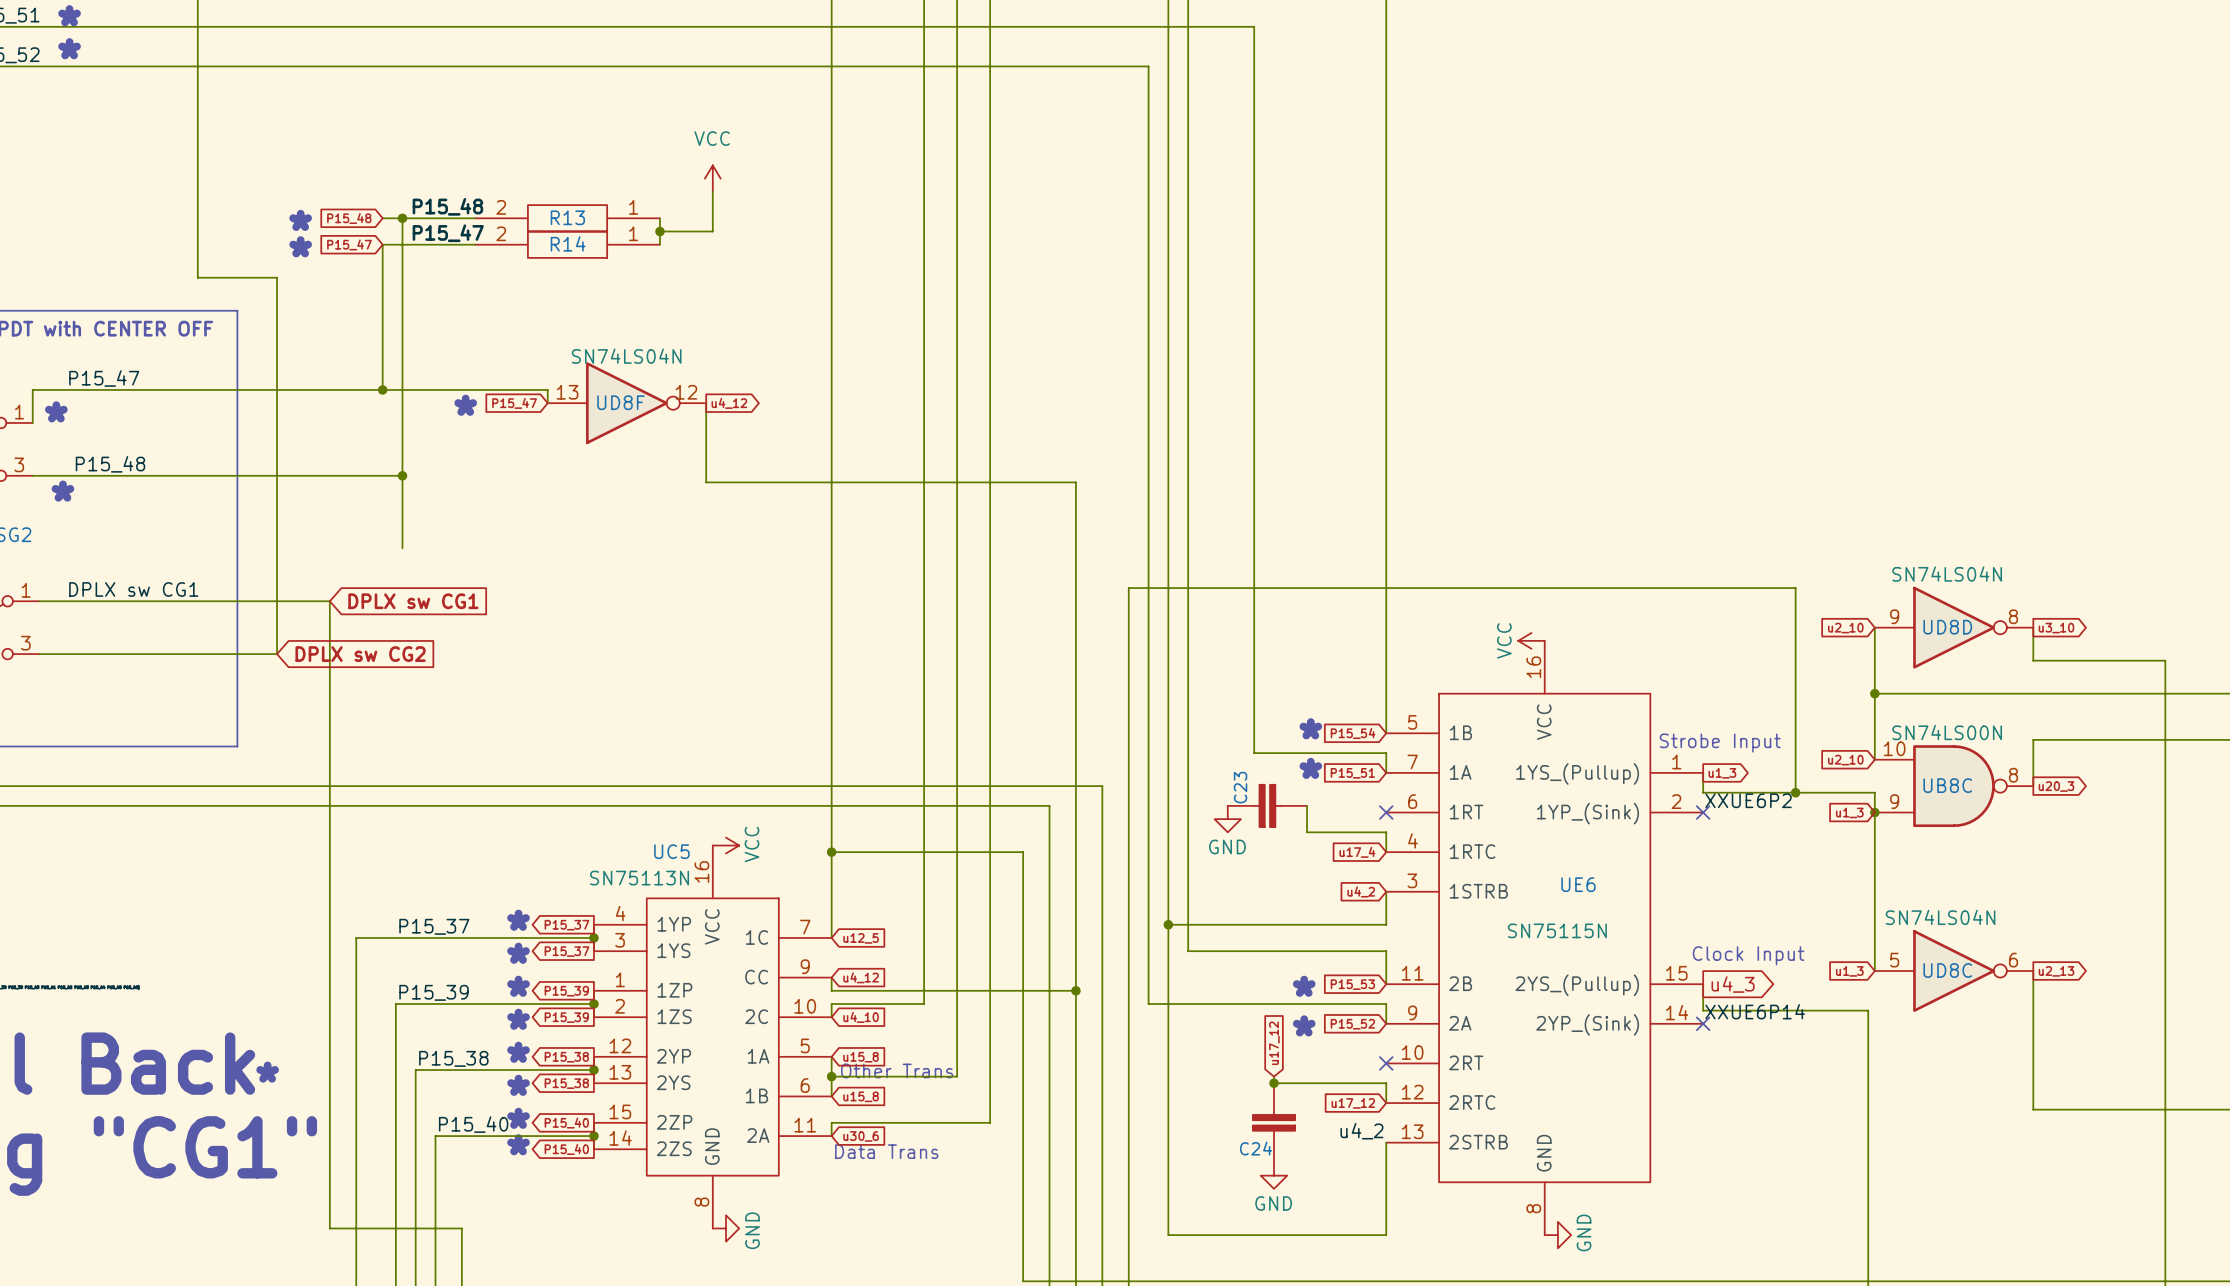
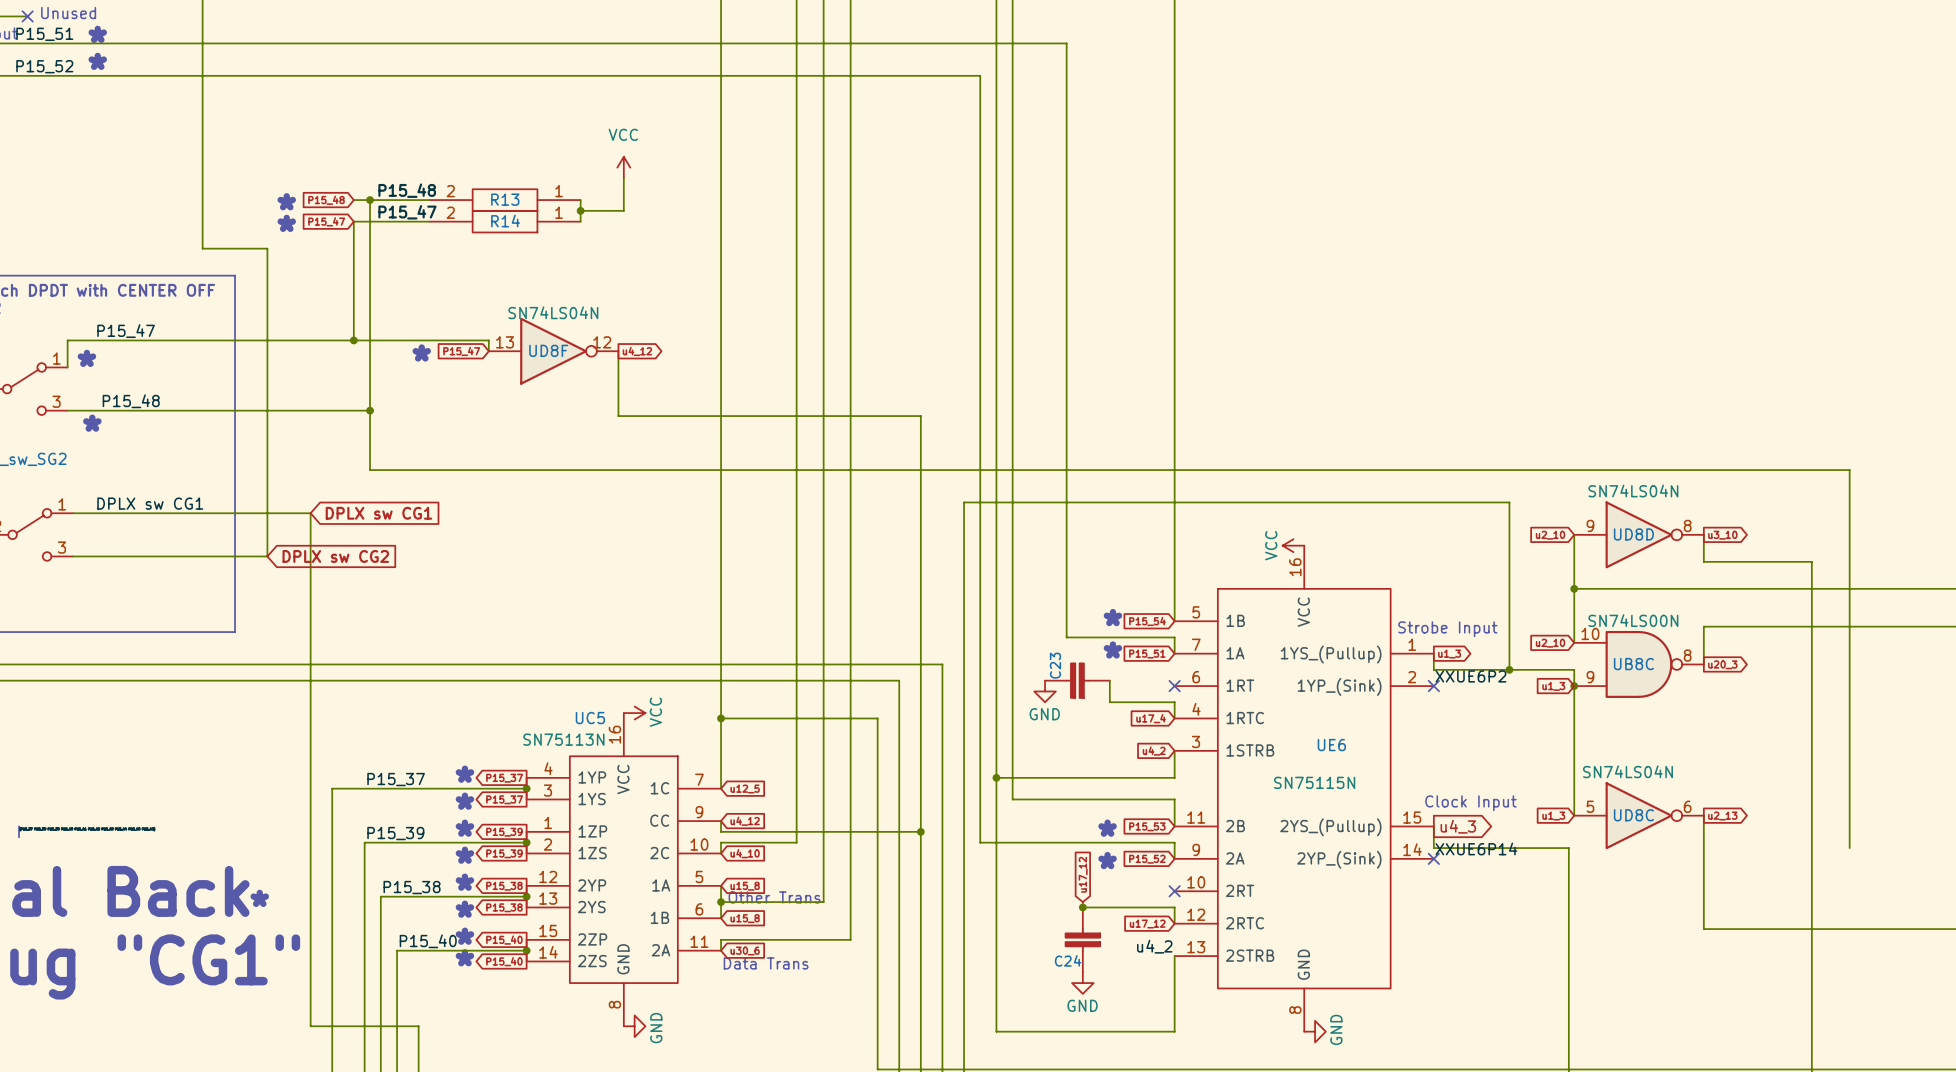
wire: none -> (370, 470) (1849, 470) (1849, 848)

